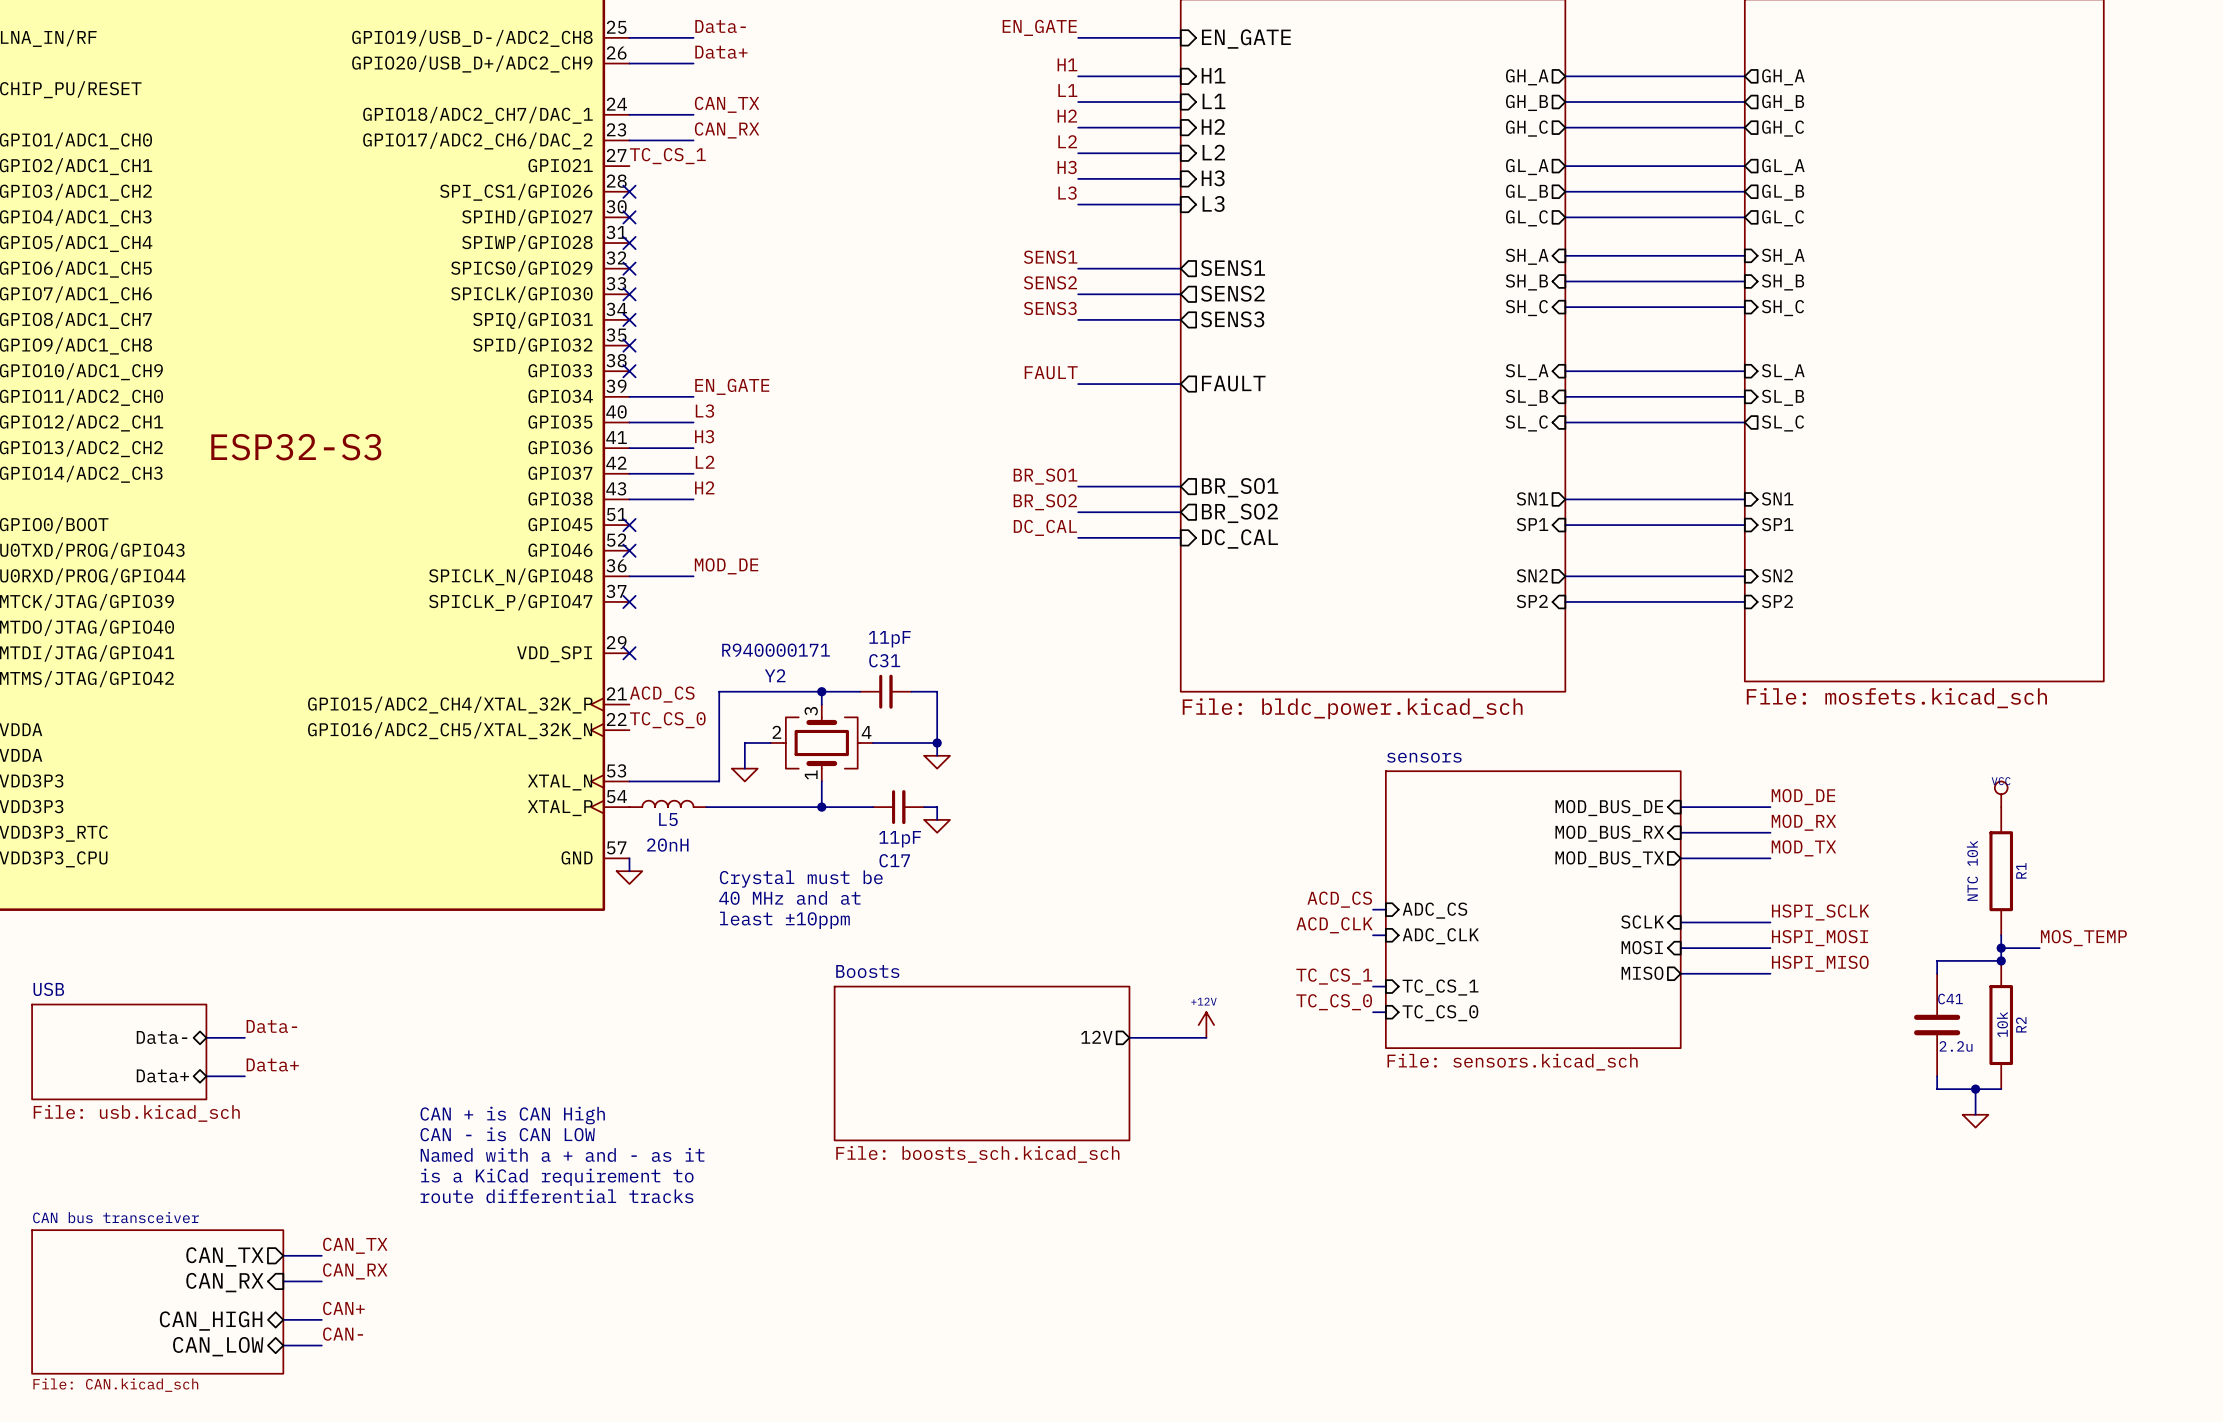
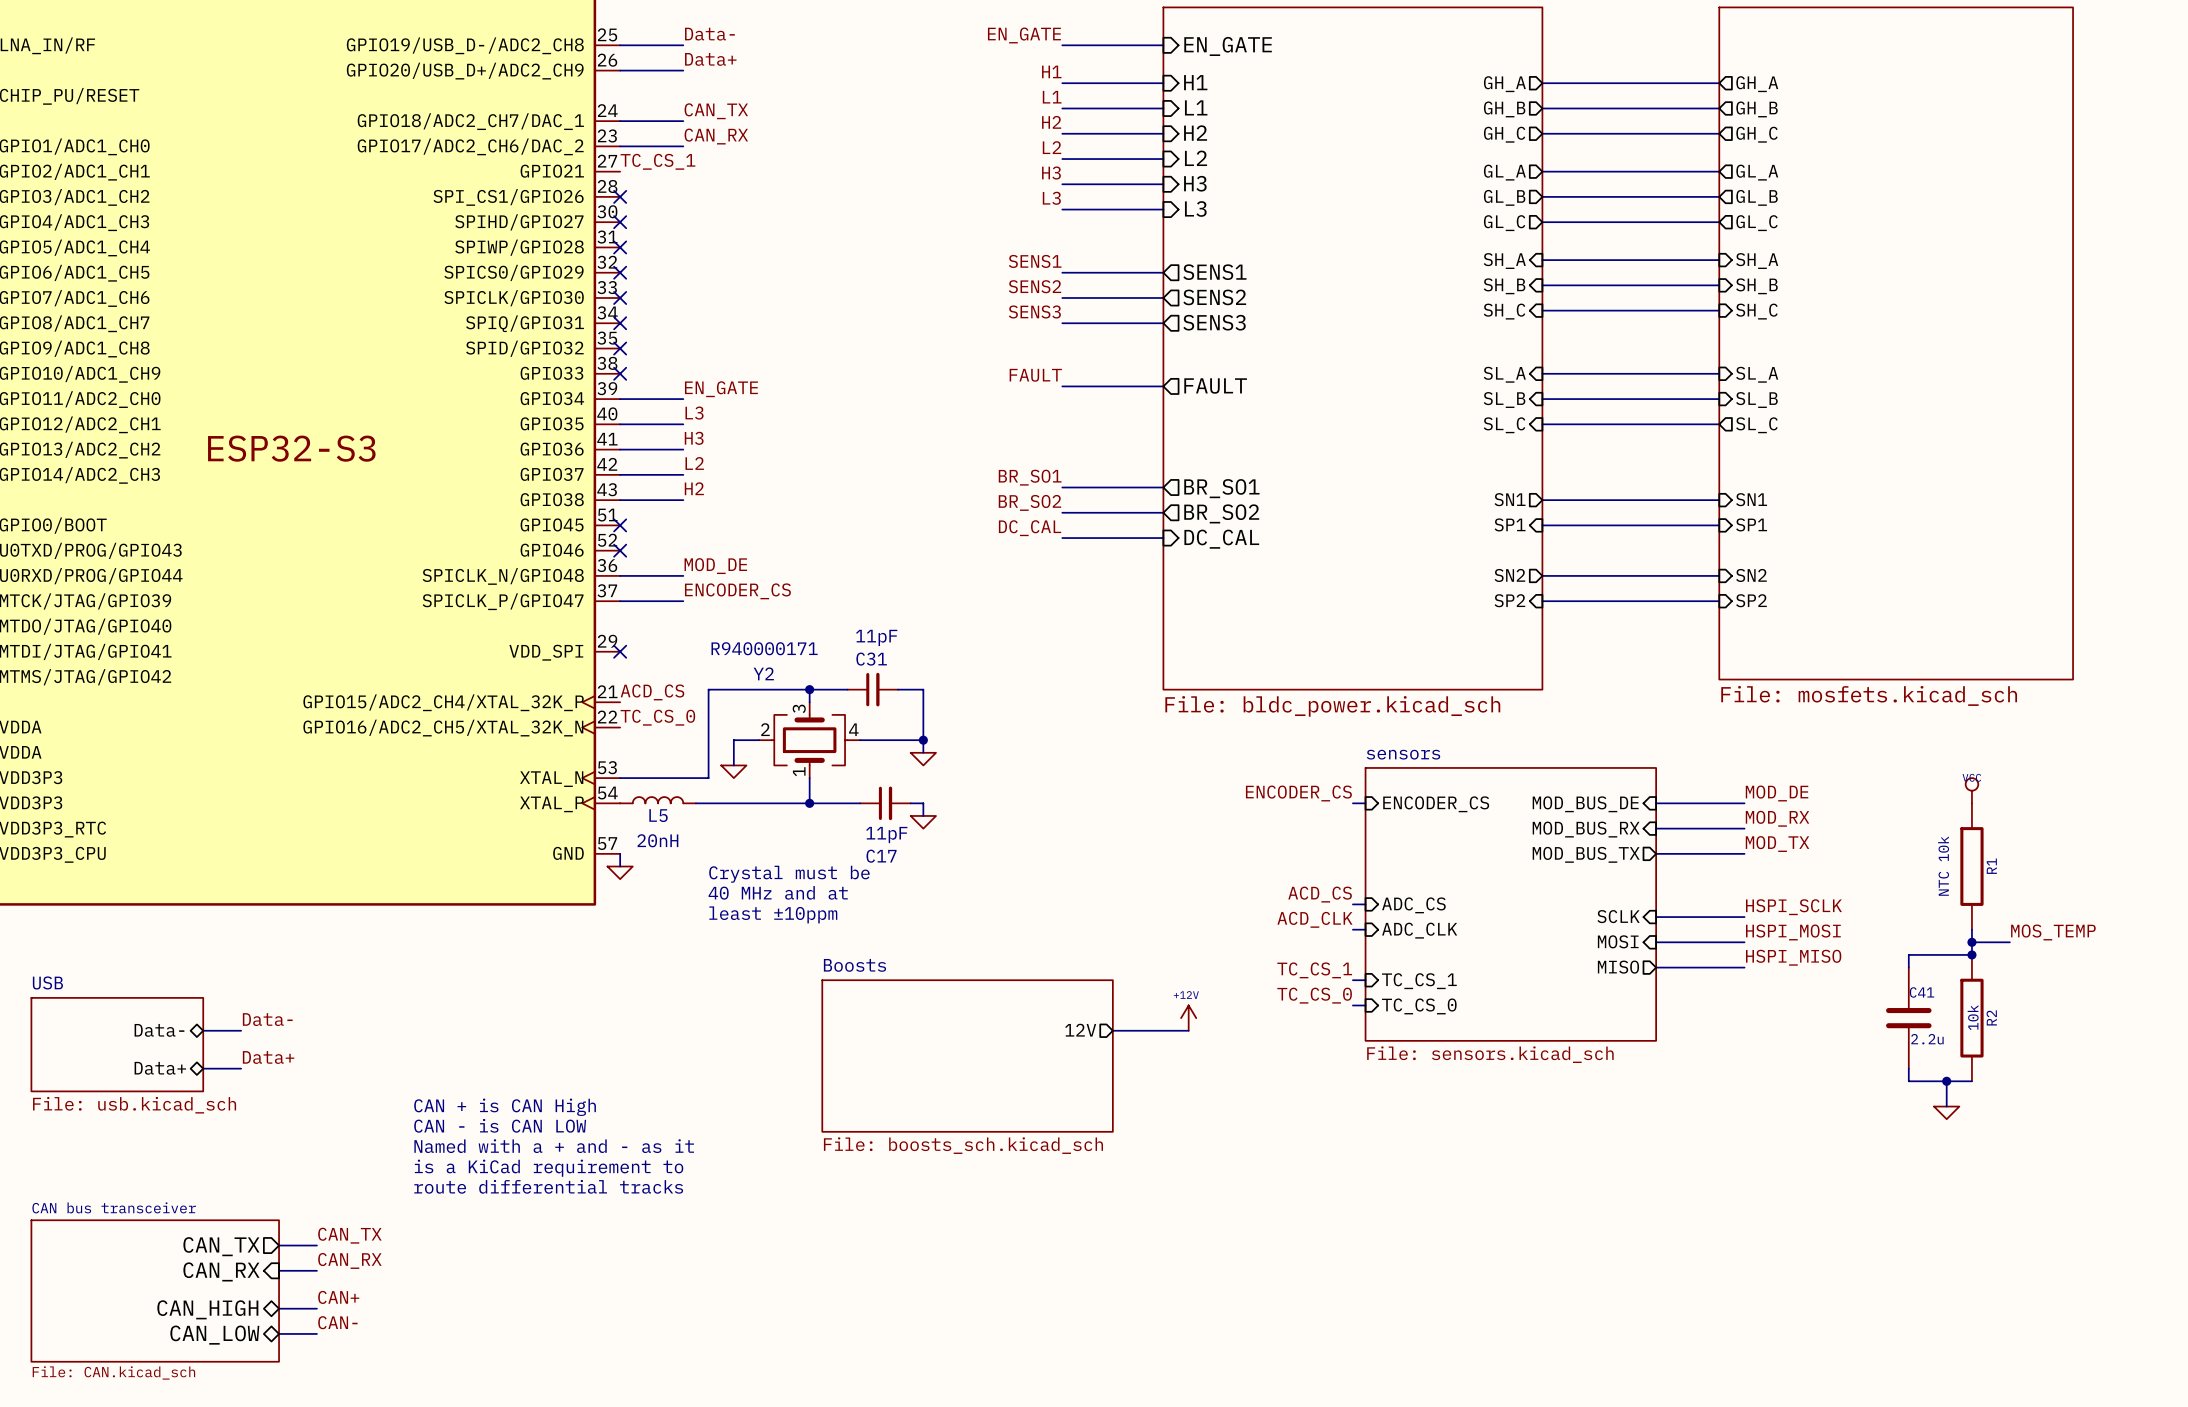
label: none -> ENCODER_CS (737, 591)
wire: none -> (620, 601) (683, 601)
no-connect mark: (629, 601) -> none
label: none -> ENCODER_CS (1298, 793)
wire: none -> (1352, 803) (1365, 803)
sheet pin: none -> ENCODER_CS (1436, 804)

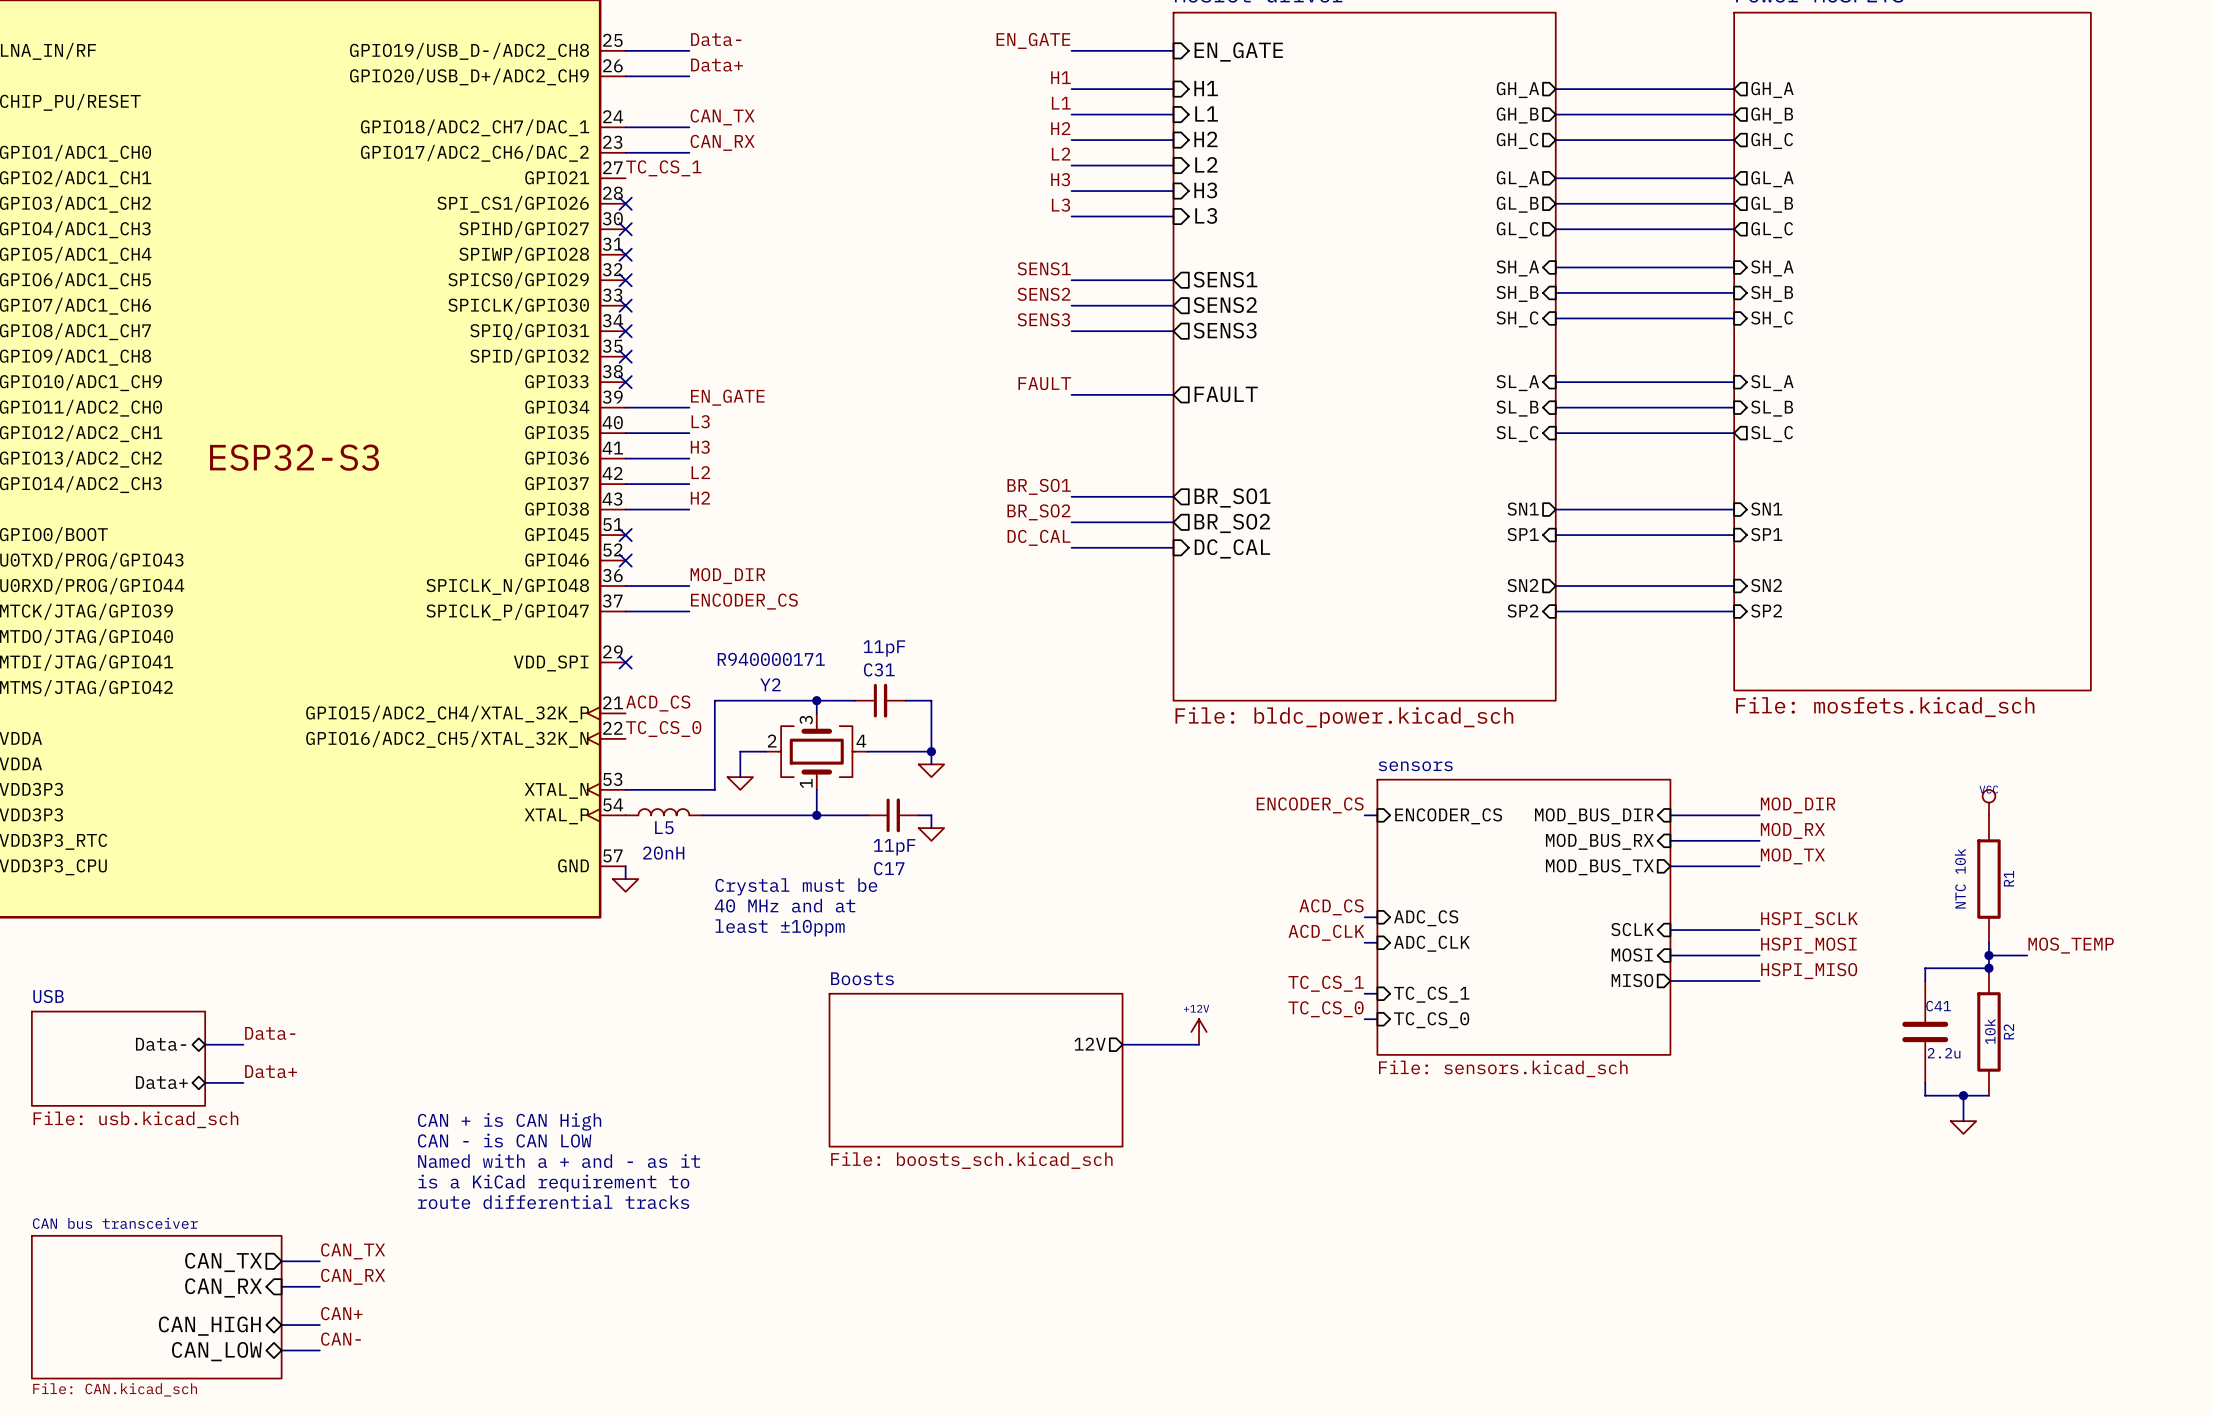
label: MOD_DE (715, 566) -> MOD_DIR (727, 576)
label: MOD_DE (1777, 793) -> MOD_DIR (1798, 805)
sheet pin: MOD_BUS_DE (1585, 804) -> MOD_BUS_DIR (1594, 816)

